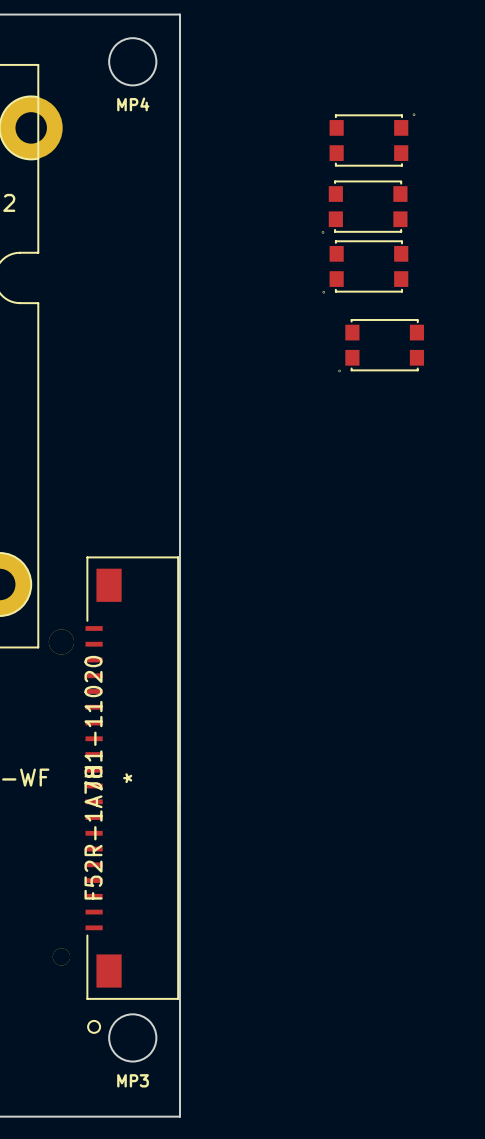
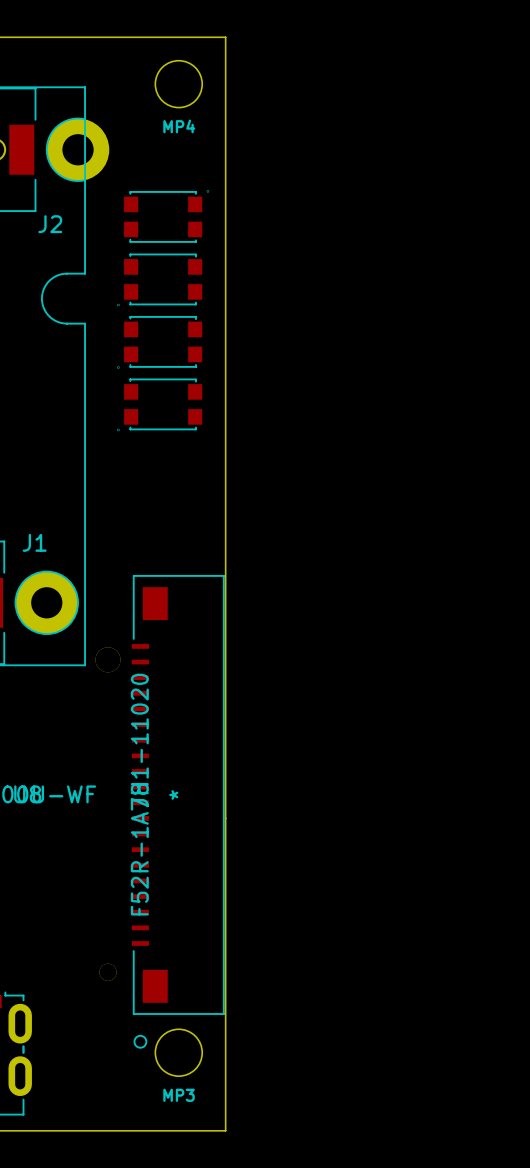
part: (372, 140) -> none
part: none -> (166, 216)
part: (364, 207) -> none
part: none -> (159, 279)
part: (365, 266) -> none
part: none -> (159, 342)
part: (381, 345) -> none
part: none -> (159, 404)

